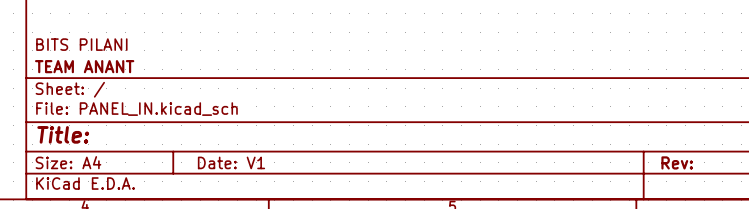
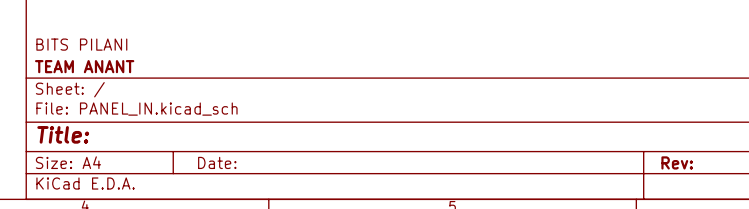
title block: Date: V1 (231, 162) -> Date: (217, 162)

